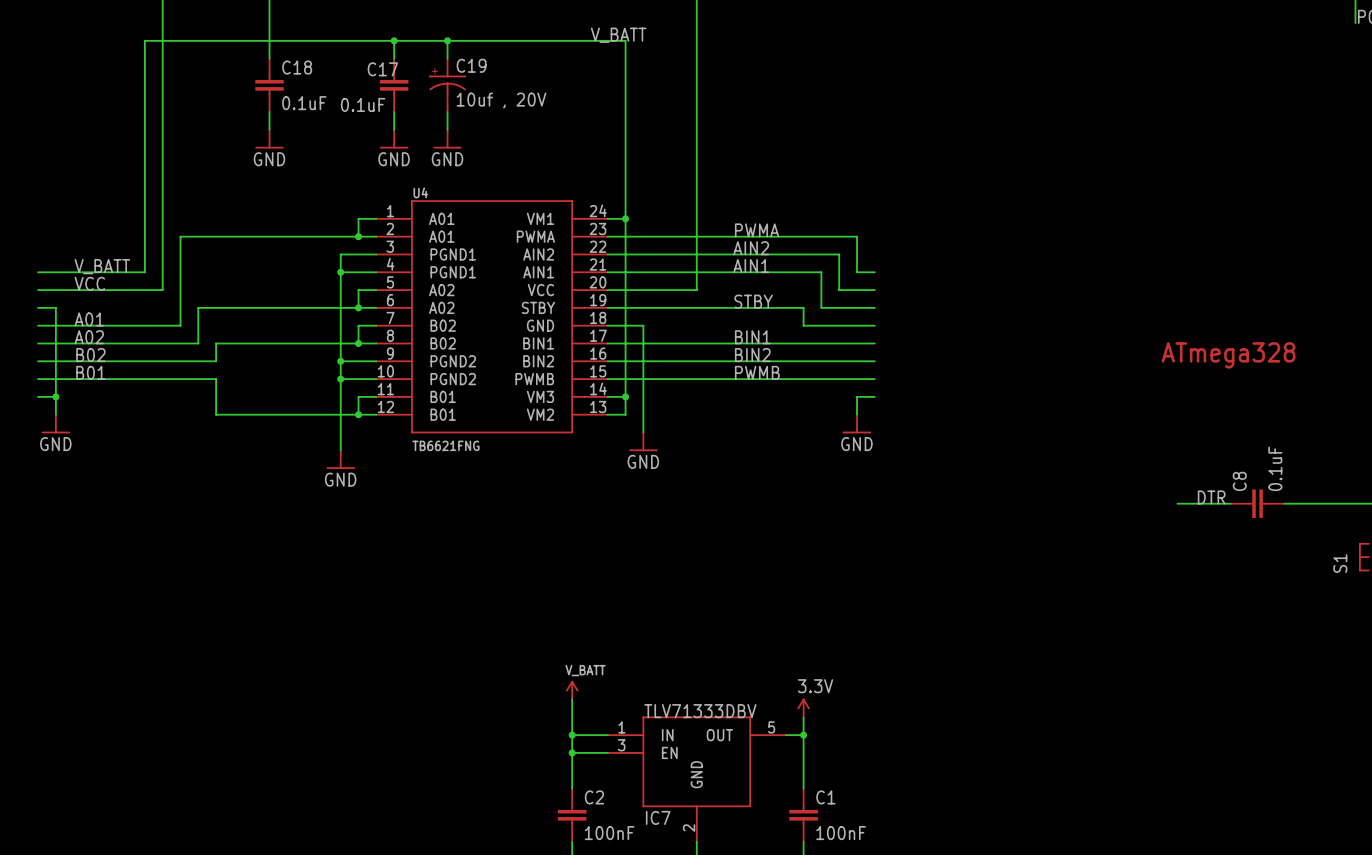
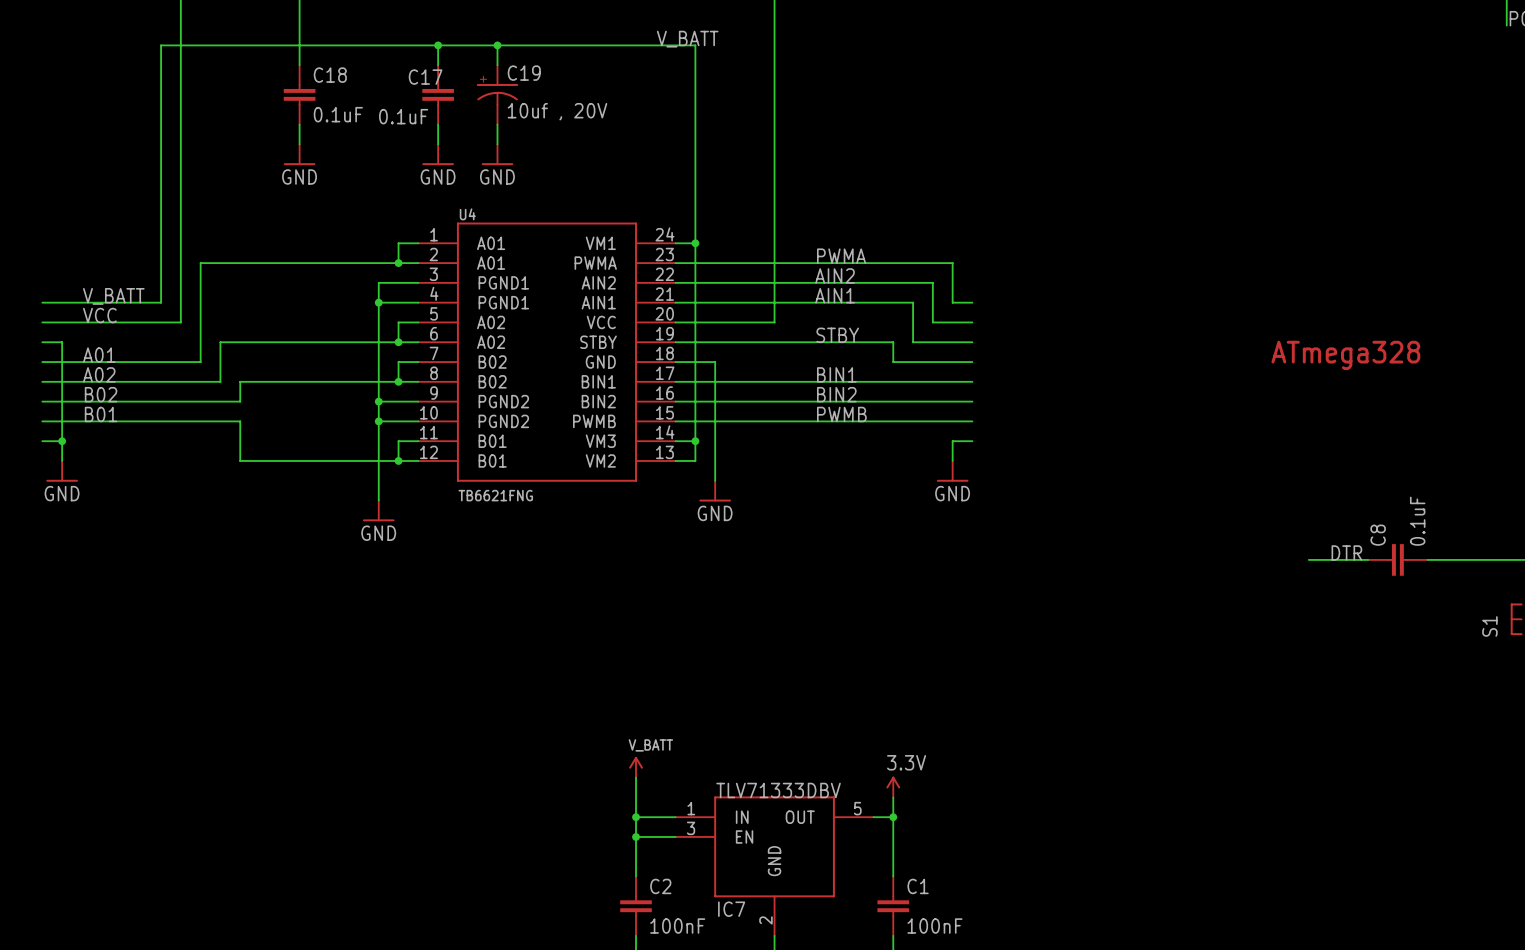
text position: ATmega328 (1228, 355) -> ATmega328 (1345, 355)

